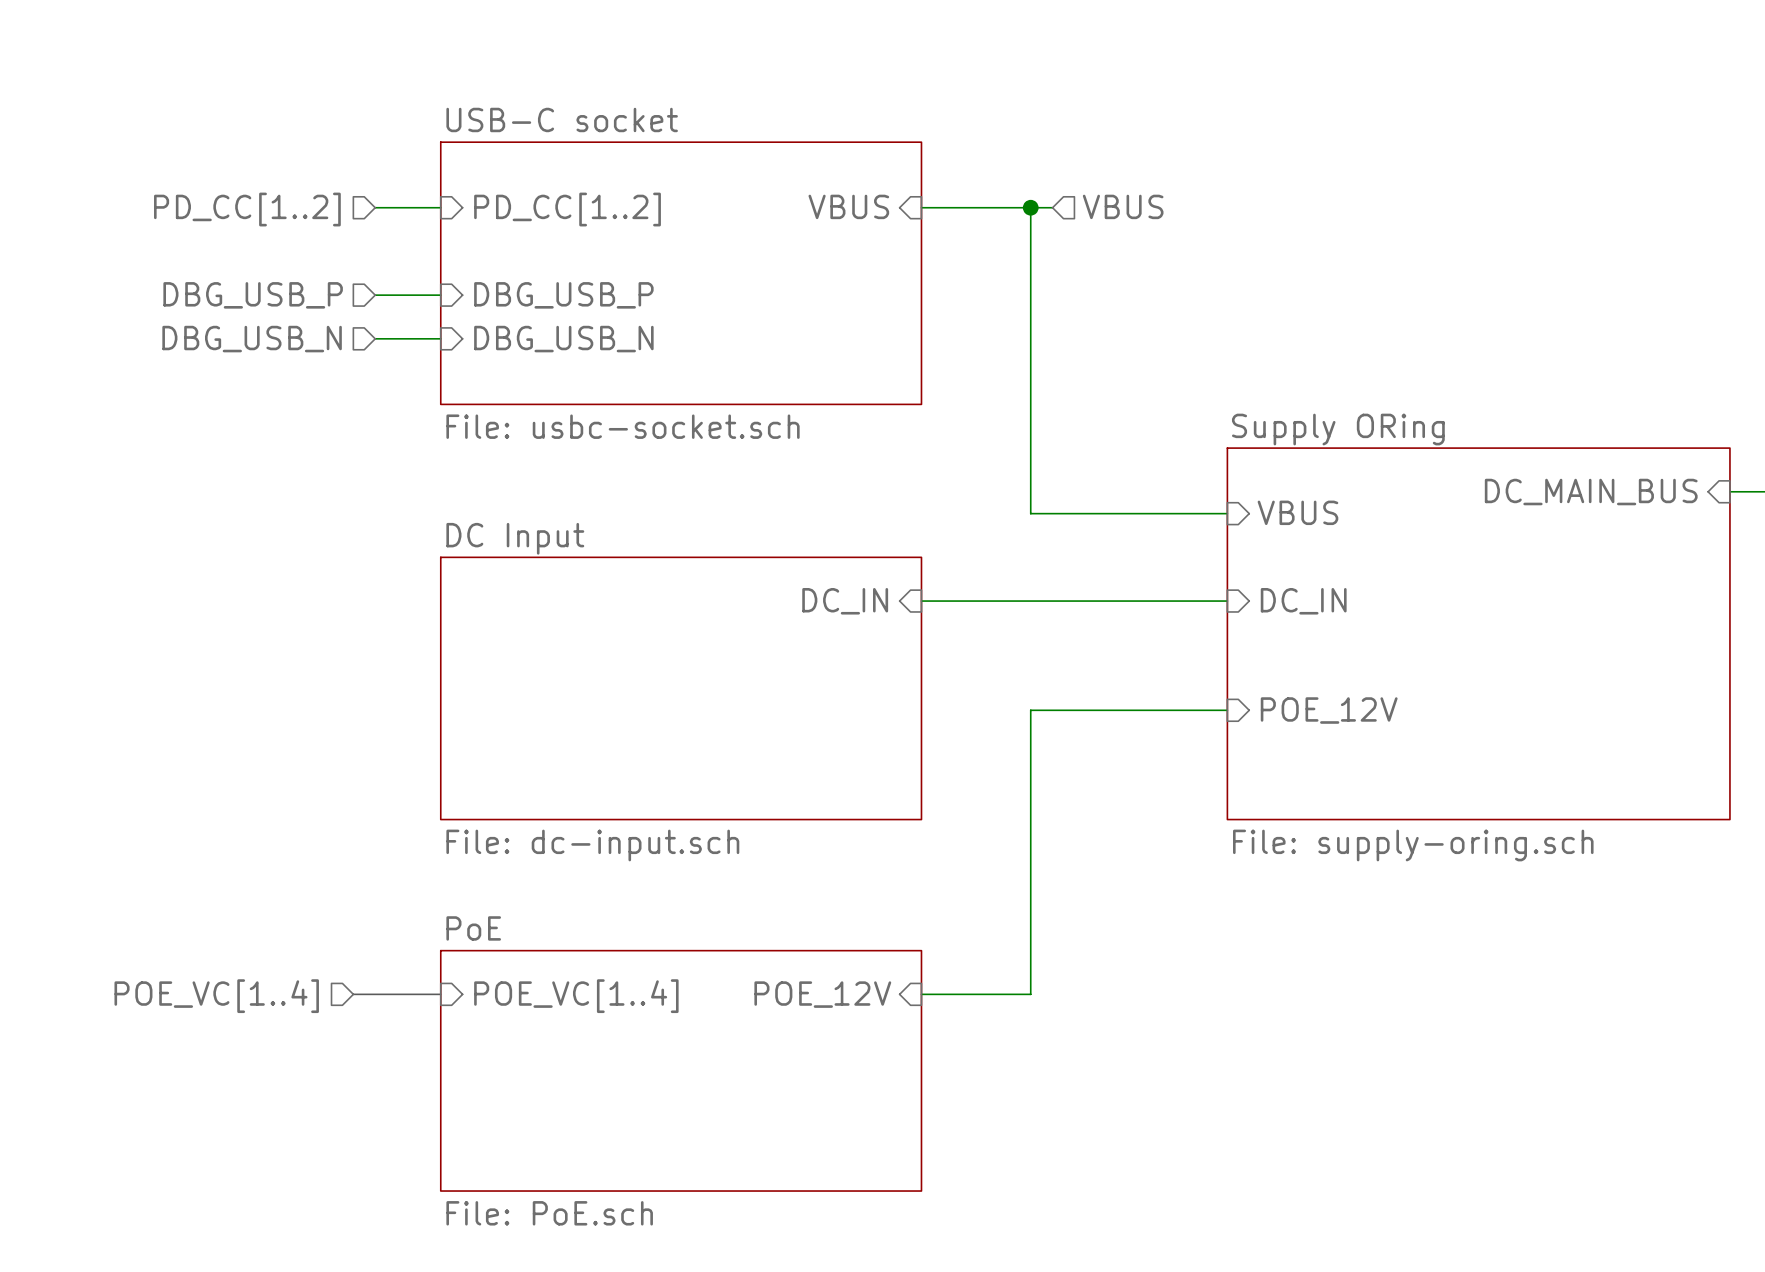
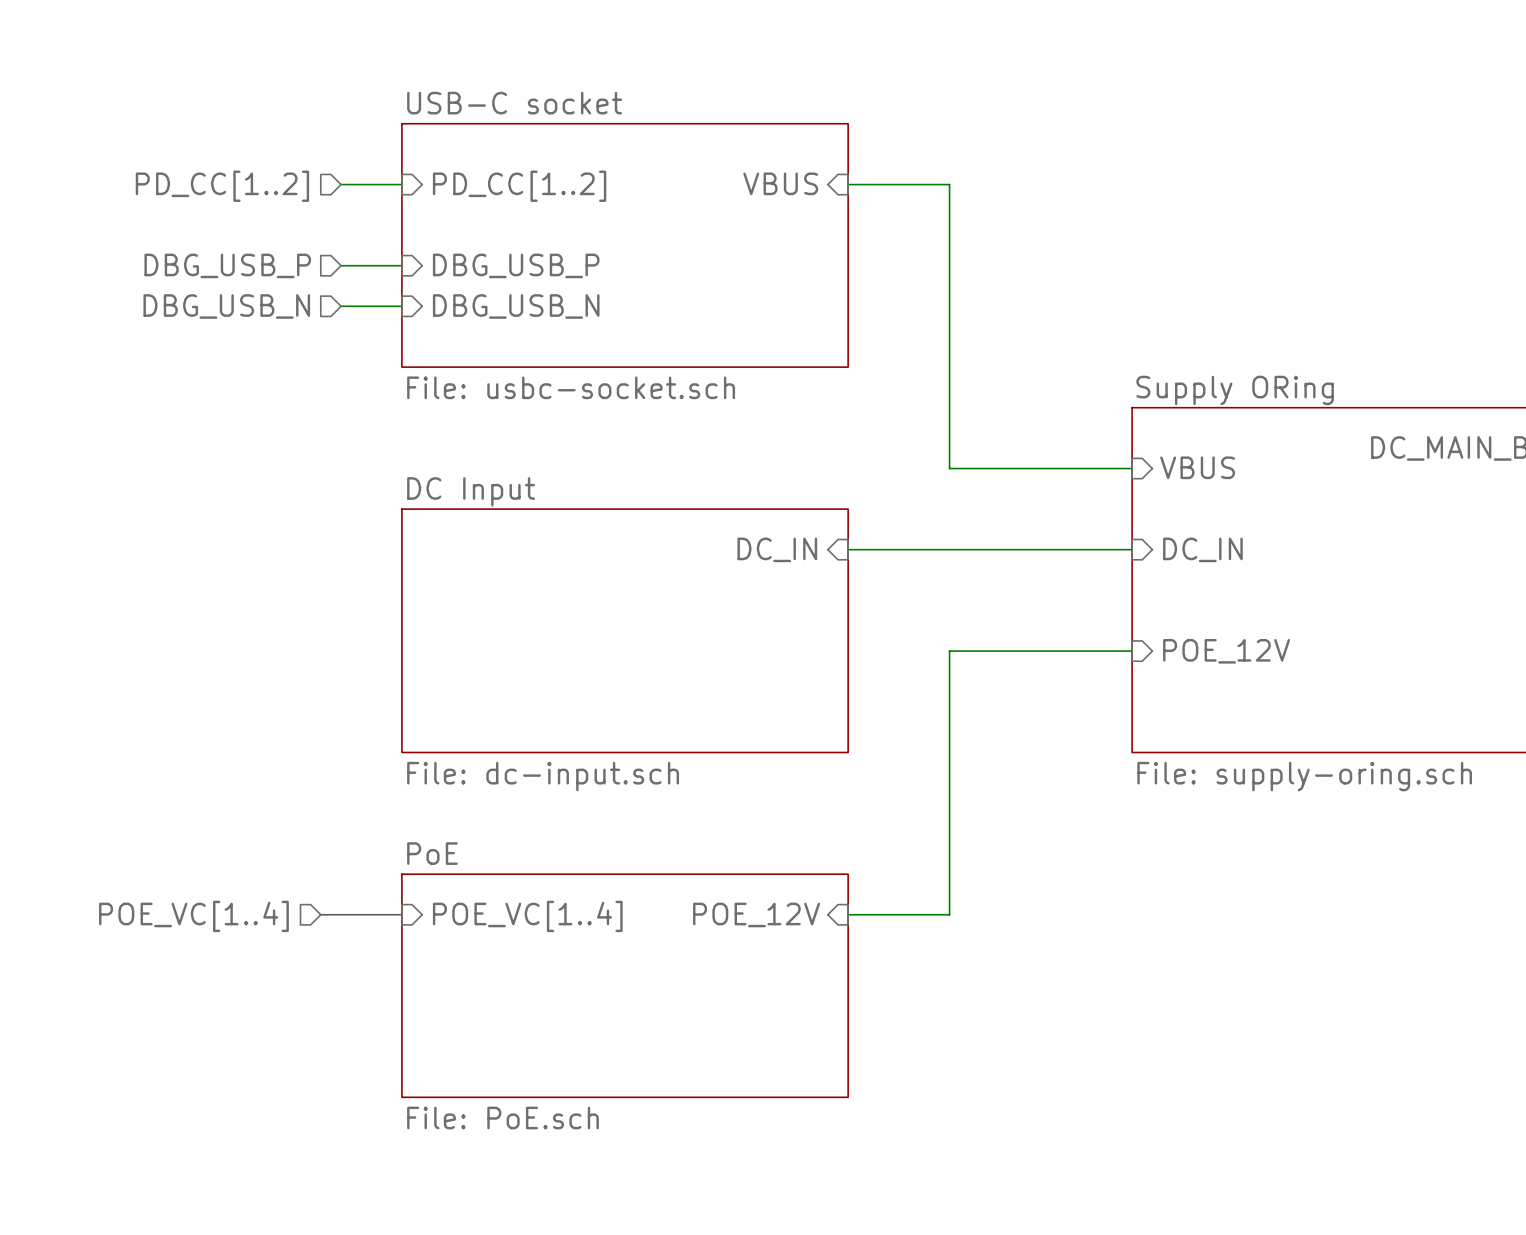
hierarchical label: VBUS (1123, 206) -> none
wire: (1030, 207) (1052, 207) -> none
junction: (1030, 207) -> none

